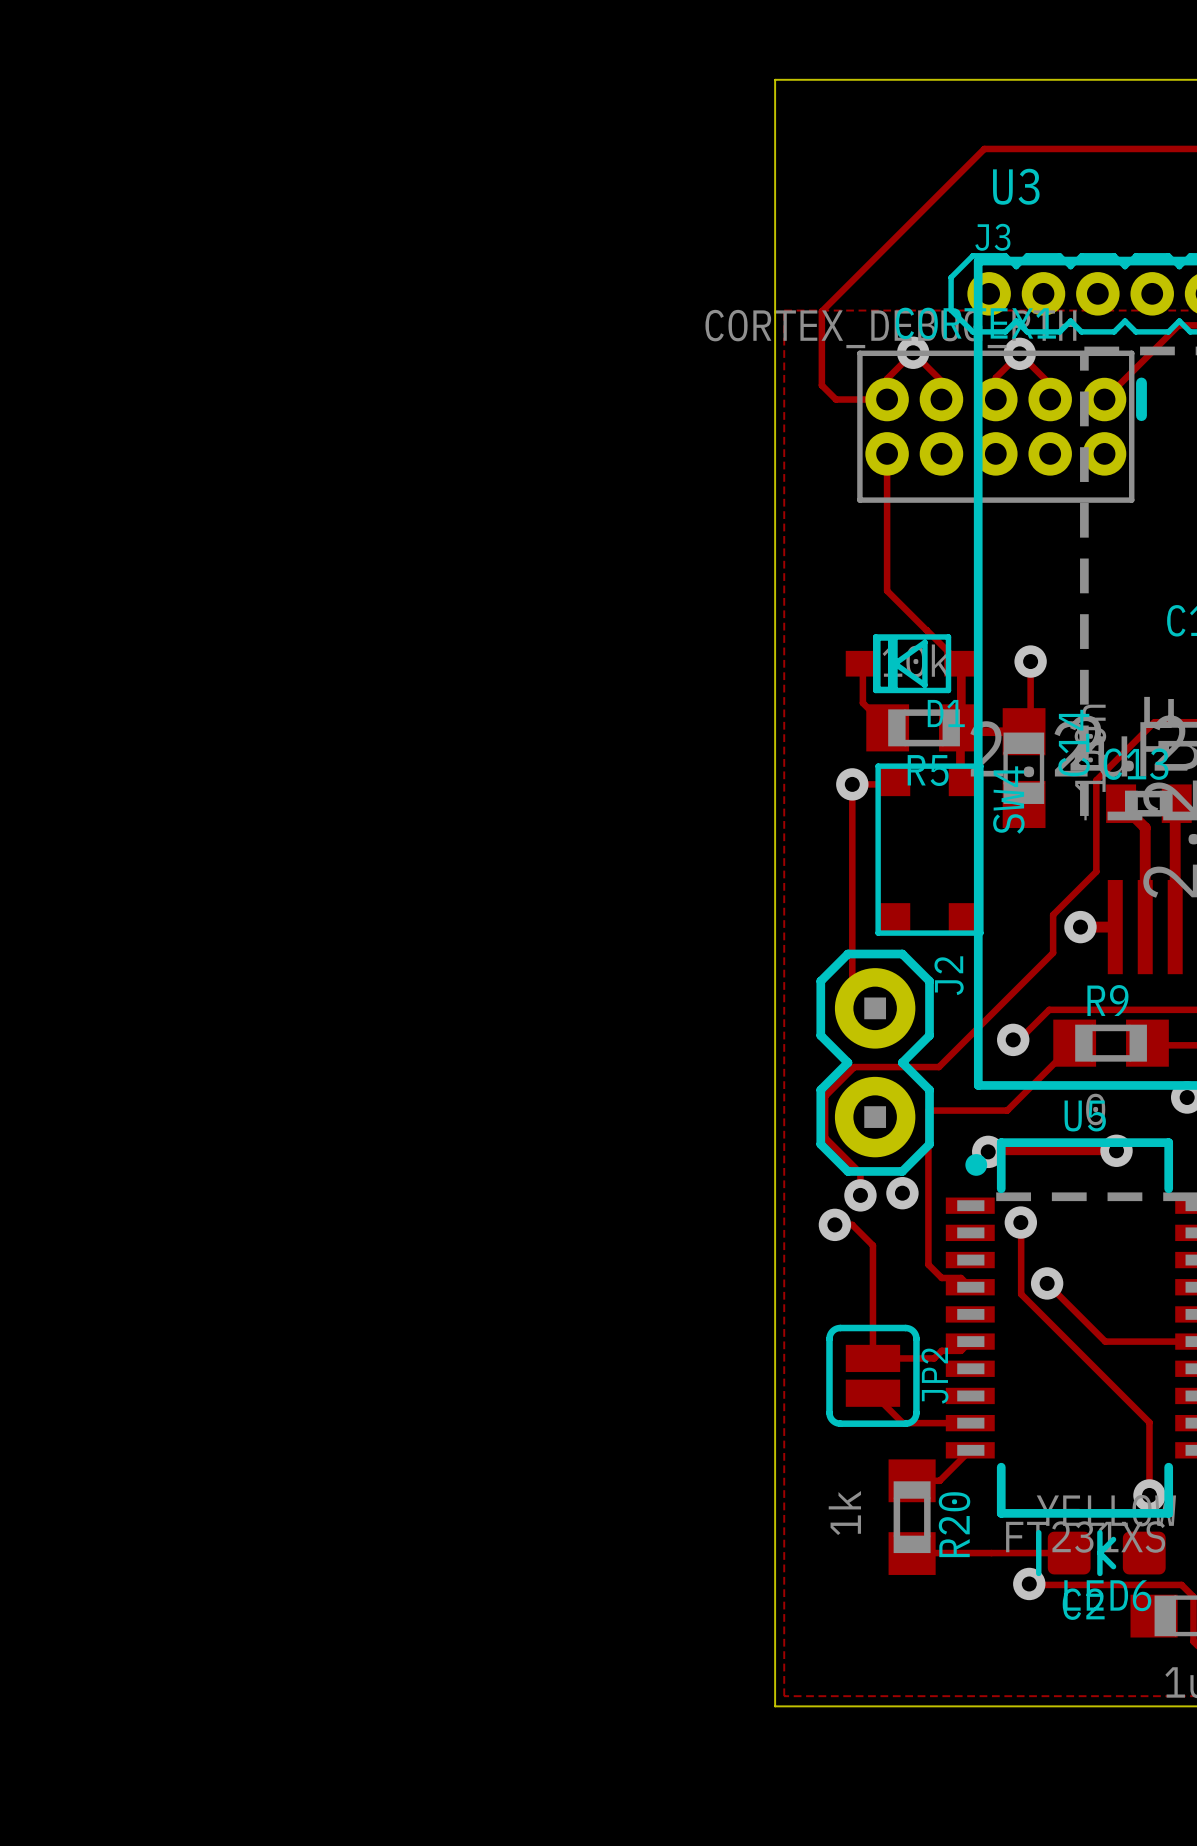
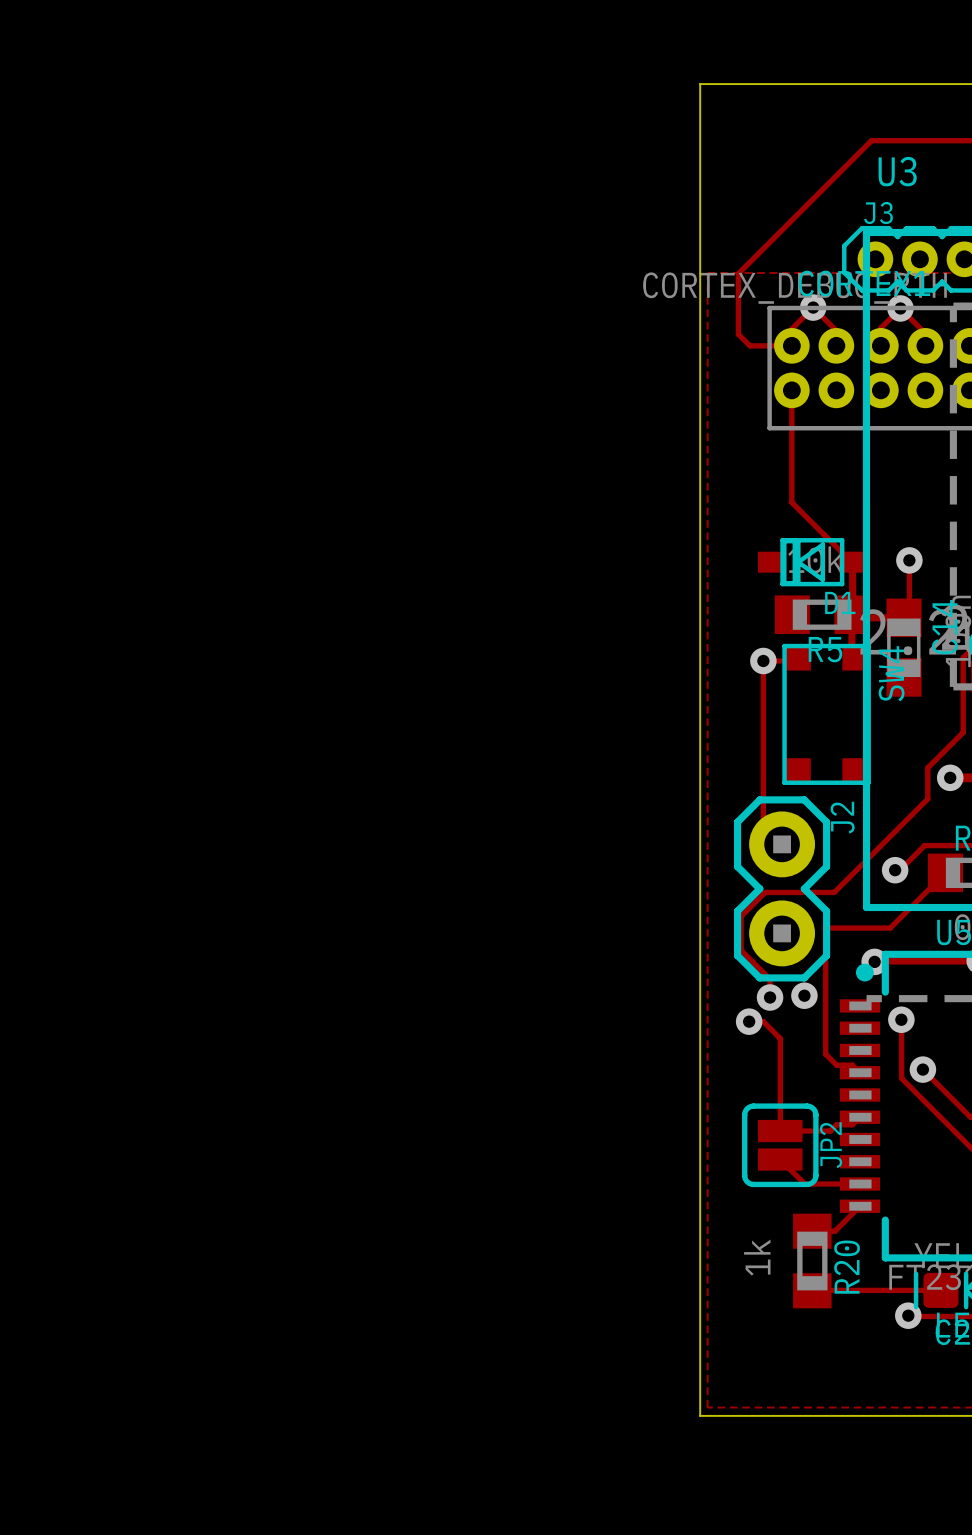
track: (862, 663) (862, 703) (887, 727) -> none

